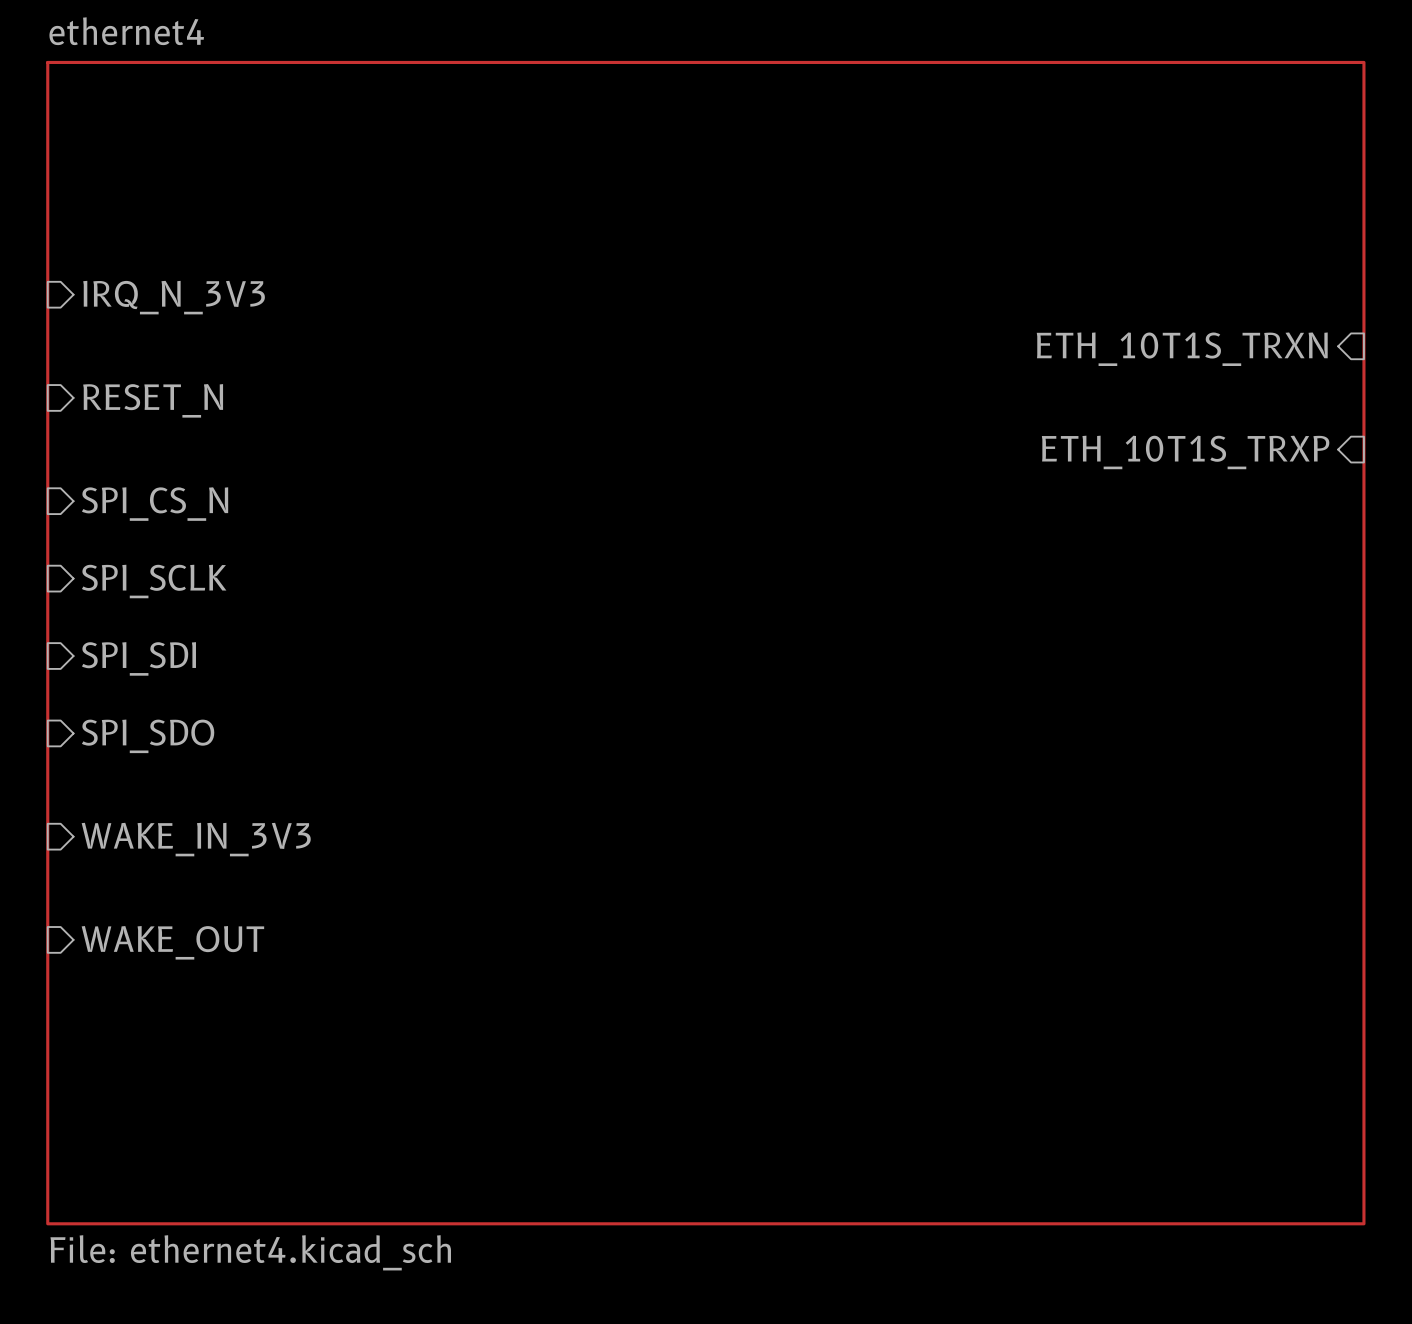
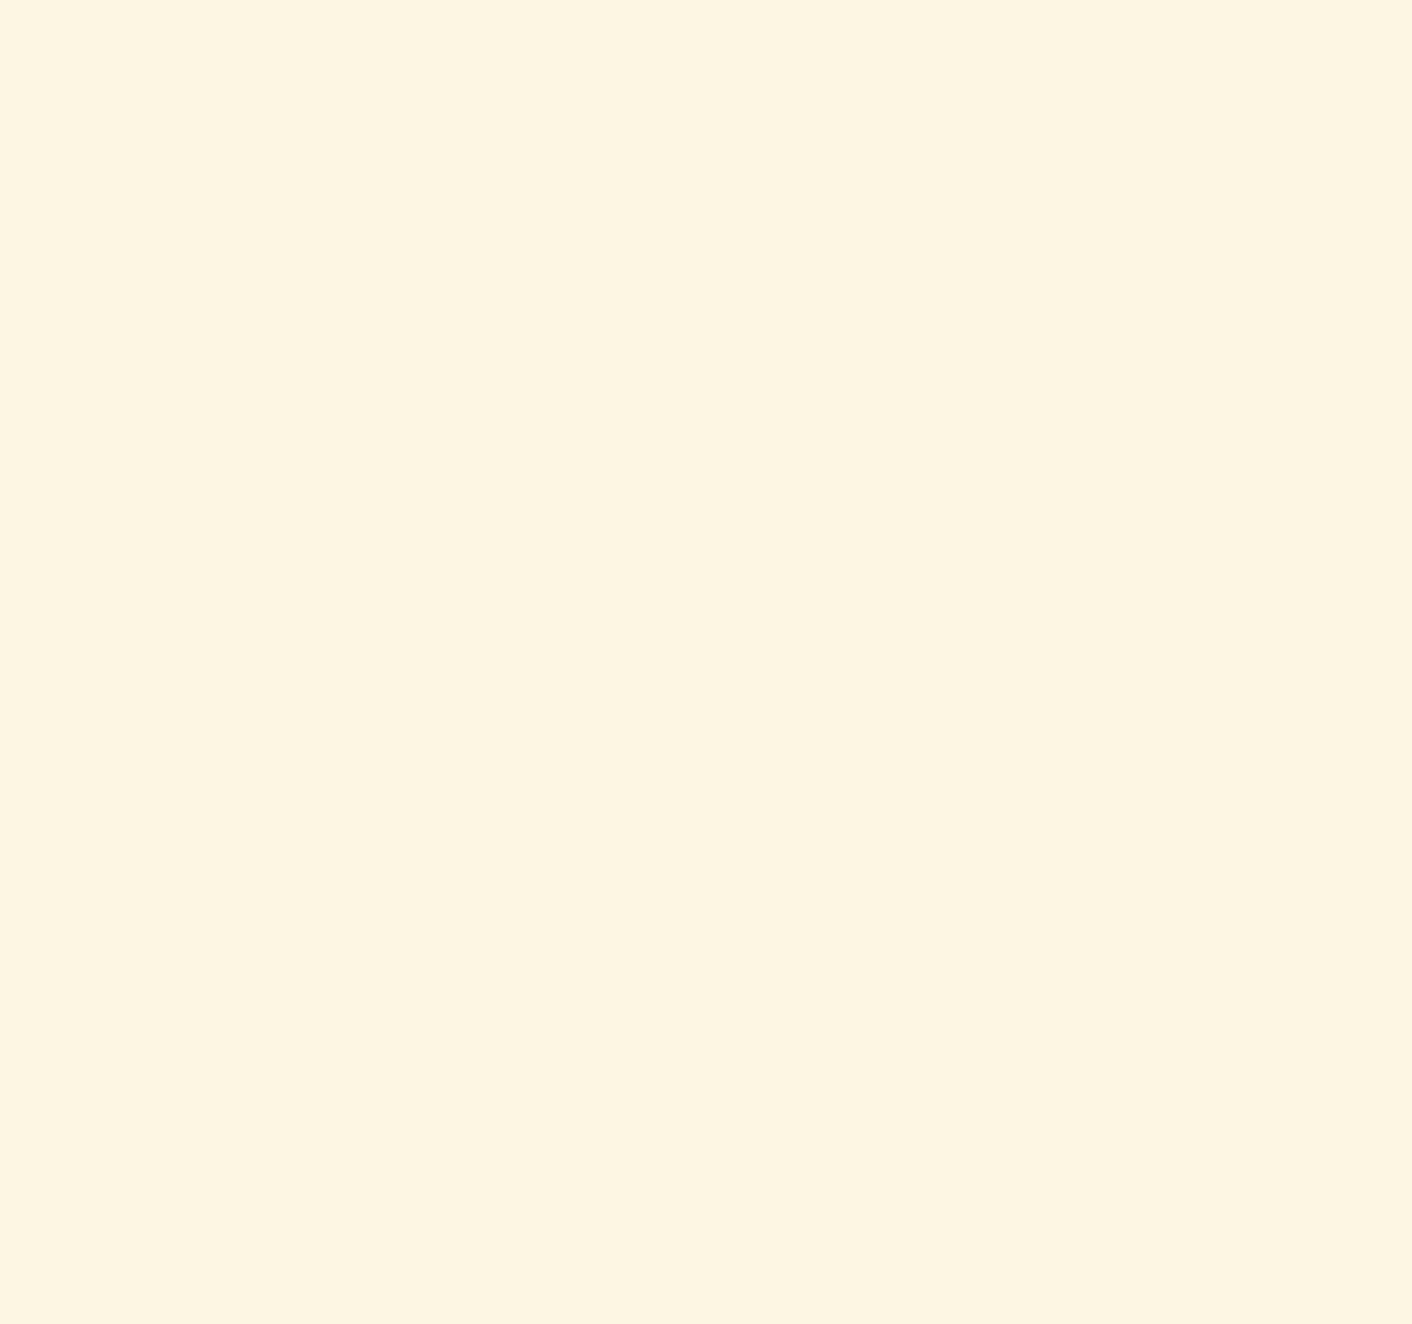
sheet pin: IRQ_N_3V3 (174, 297) -> none
sheet pin: ETH_10T1S_TRXN (1182, 349) -> none
sheet pin: RESET_N (153, 400) -> none
sheet pin: ETH_10T1S_TRXP (1185, 452) -> none
sheet pin: SPI_CS_N (155, 504) -> none
sheet pin: SPI_SCLK (154, 581) -> none
sheet ethernet4: File: ethernet4.kicad_sch (705, 643) -> none
sheet pin: SPI_SDI (138, 658) -> none
sheet pin: SPI_SDO (148, 736) -> none
sheet pin: WAKE_IN_3V3 (196, 839) -> none
sheet pin: WAKE_OUT (172, 942) -> none

